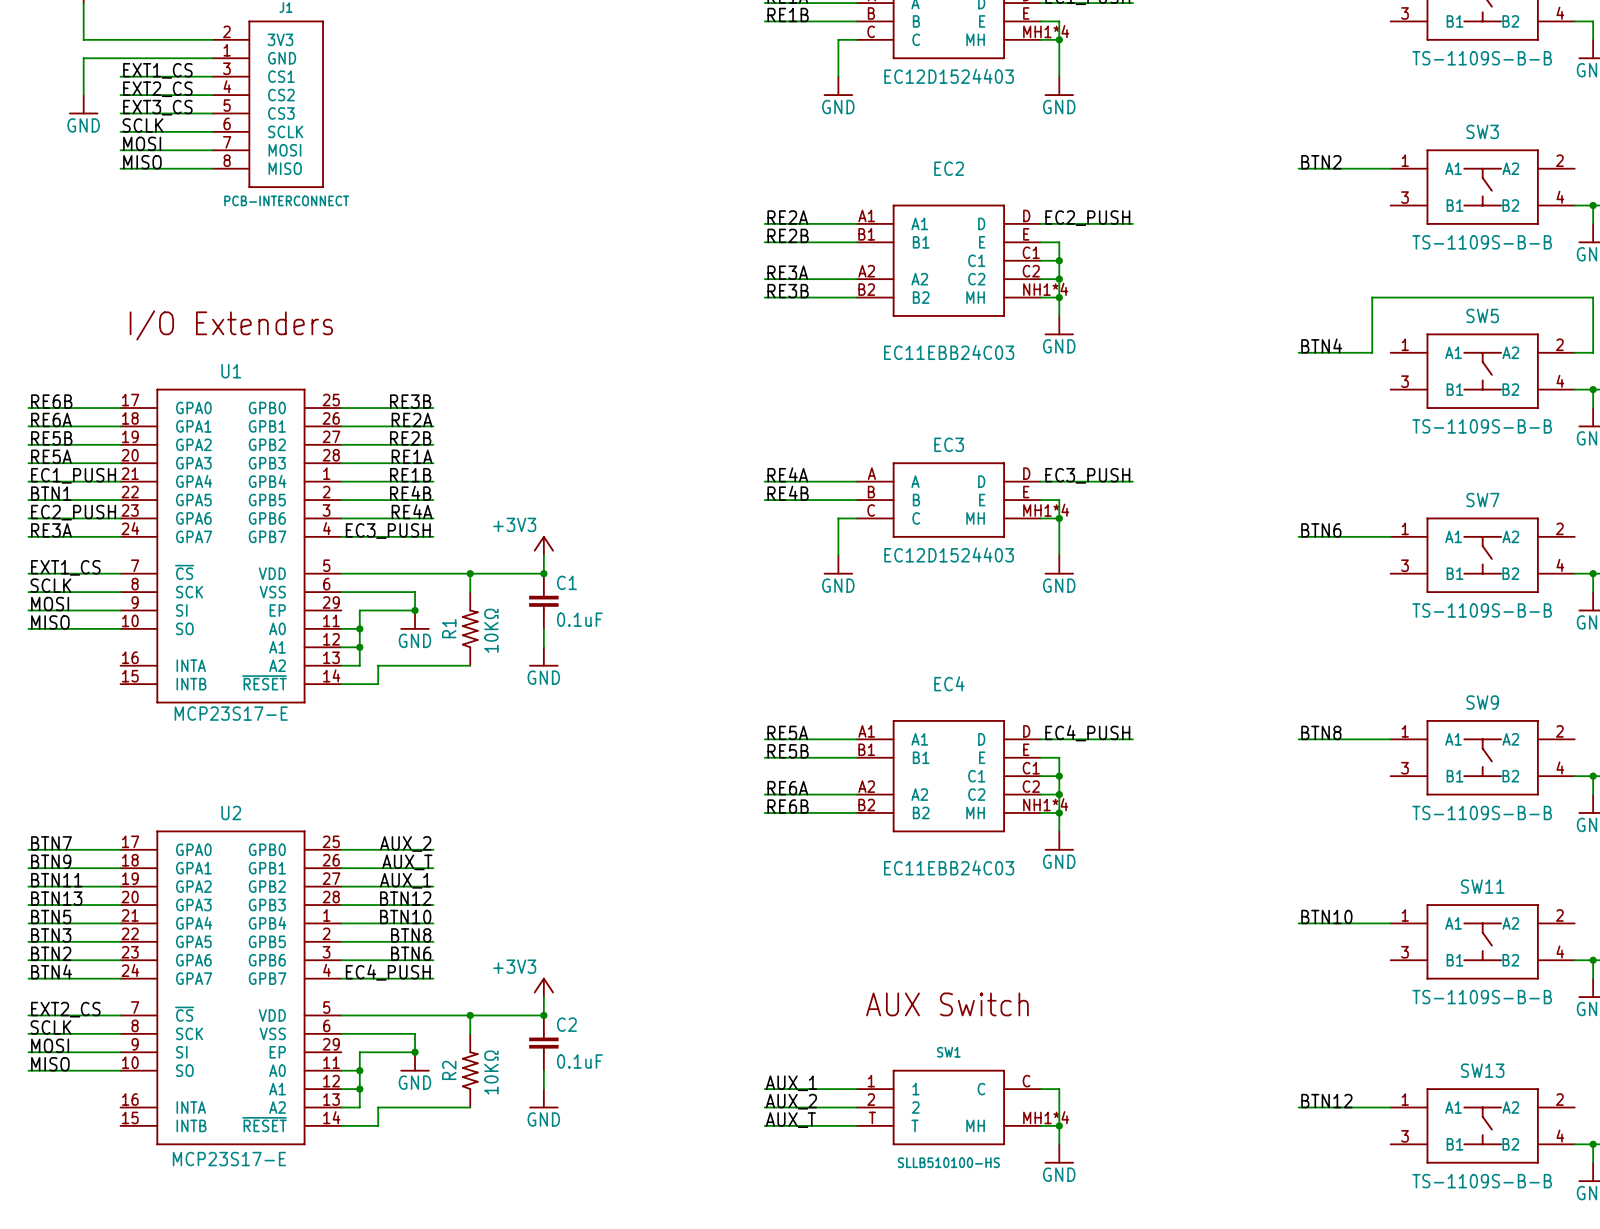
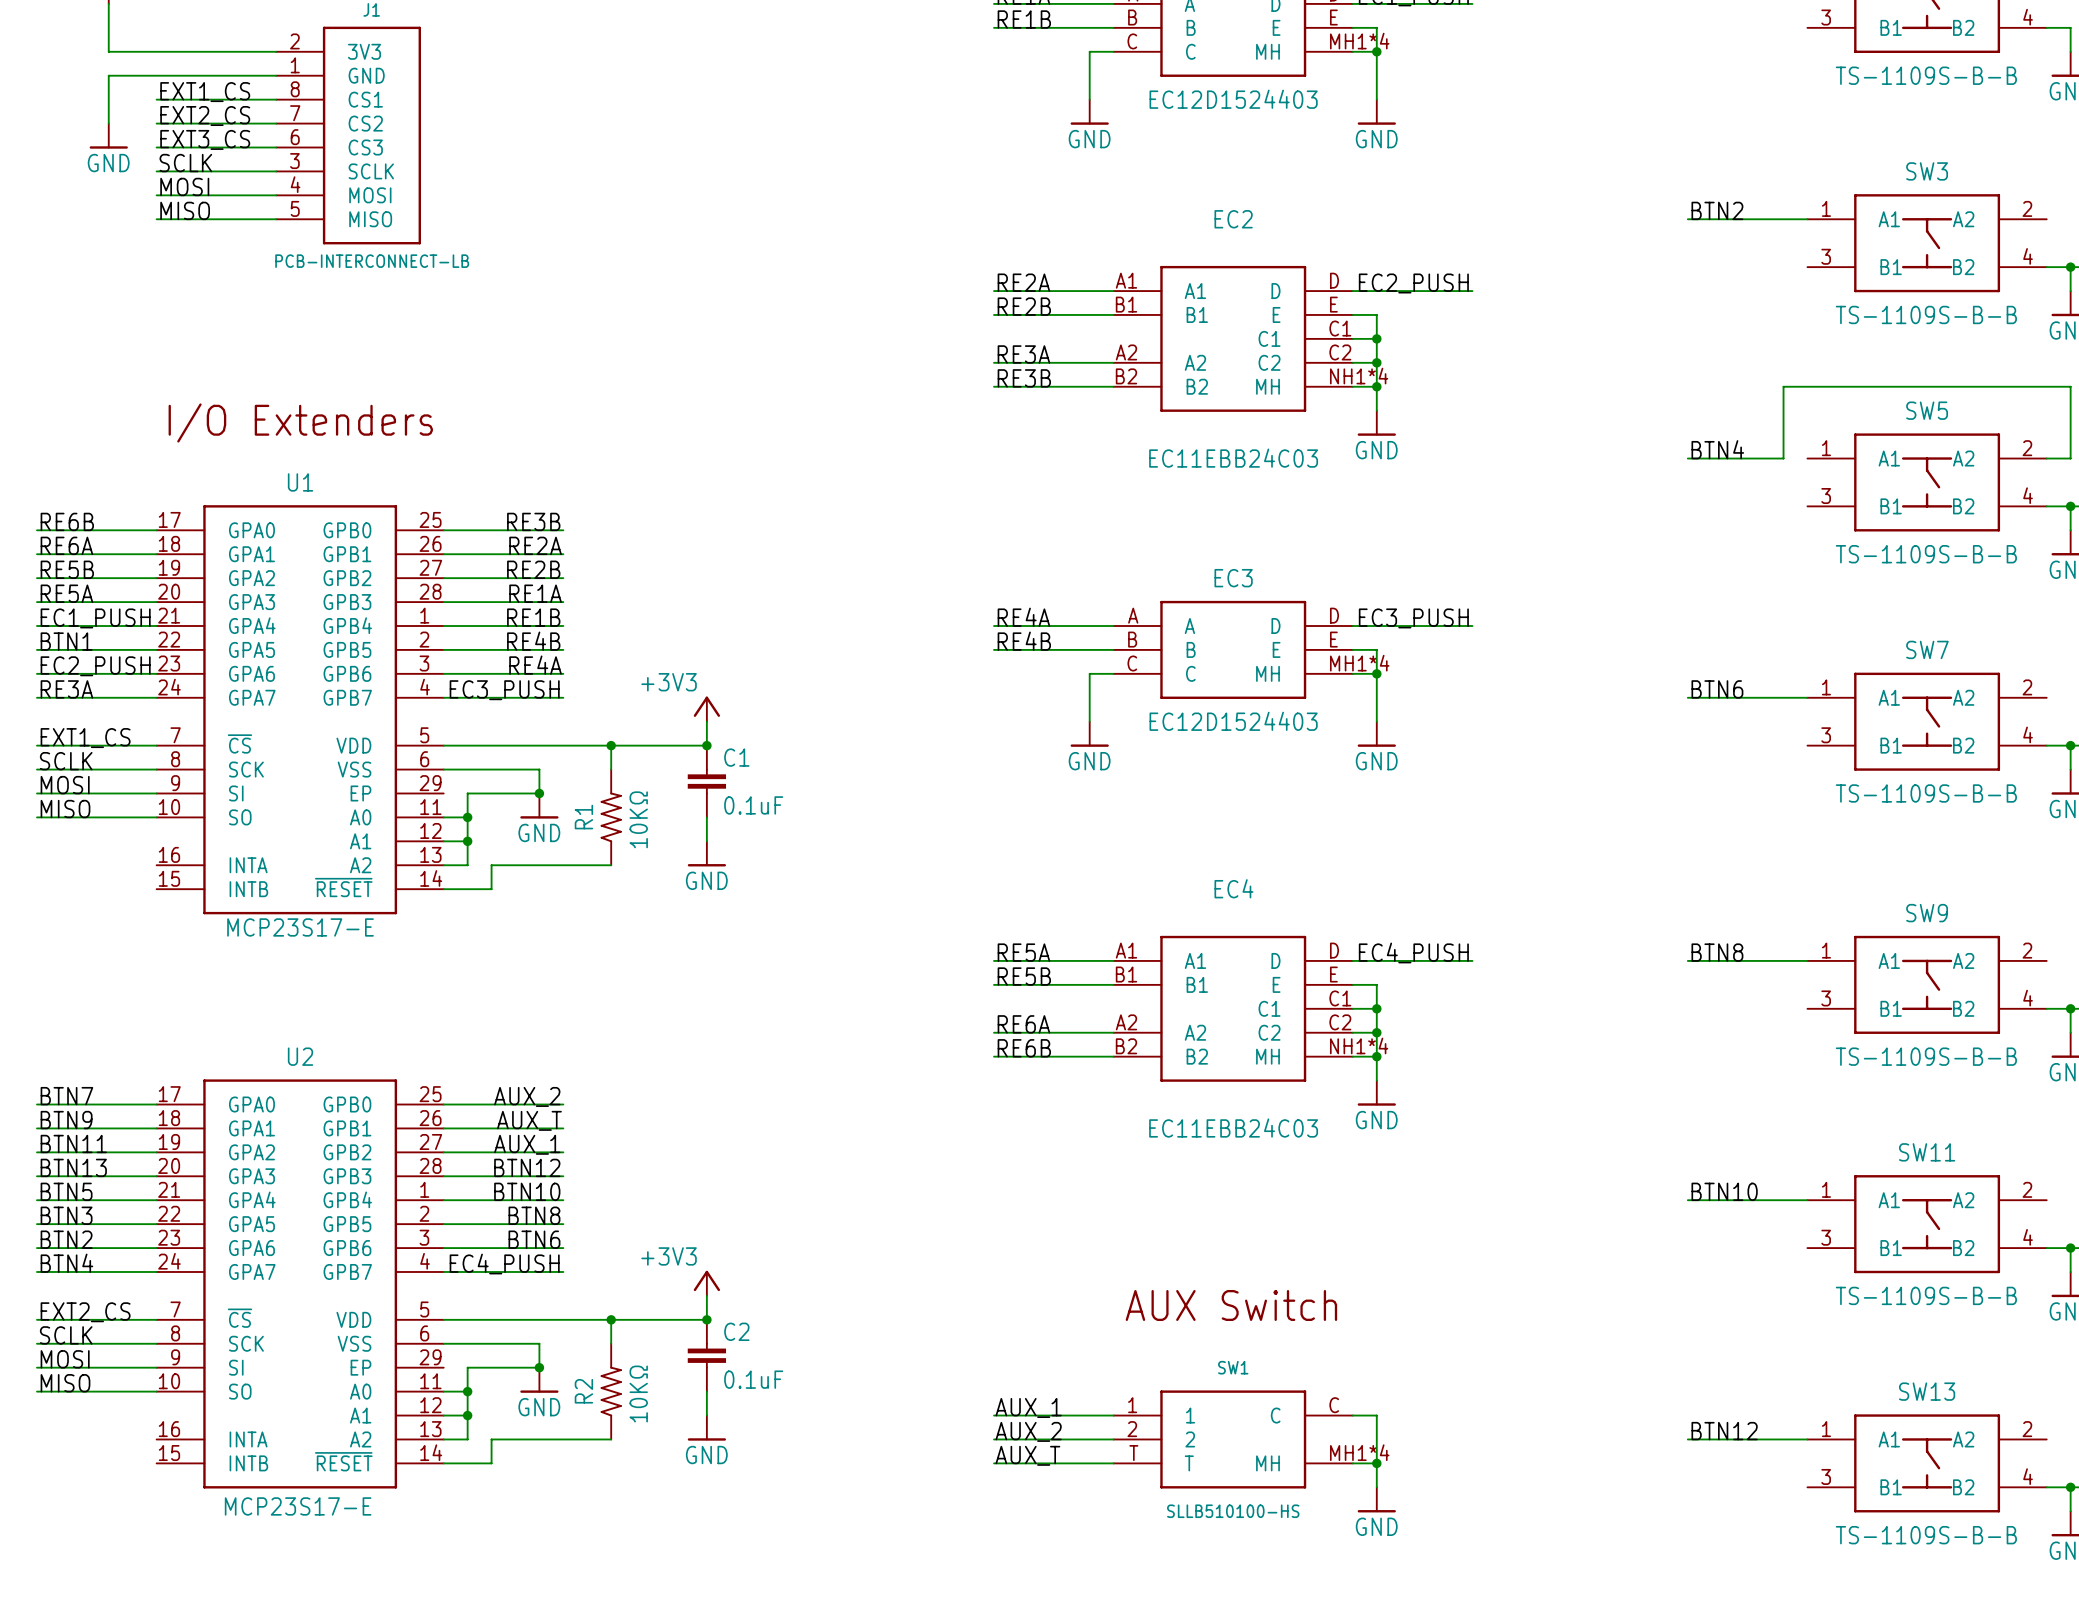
J1 pin number: 3 (226, 68) -> 8 (295, 89)
J1 pin number: 4 (227, 86) -> 7 (295, 113)
J1 pin number: 5 (227, 105) -> 6 (295, 137)
J1 pin number: 6 (227, 123) -> 3 (294, 161)
J1 pin number: 7 (227, 142) -> 4 (295, 184)
J1 pin number: 8 (227, 160) -> 5 (295, 208)
J1 value: PCB-INTERCONNECT (286, 200) -> PCB-INTERCONNECT-LB (372, 261)

